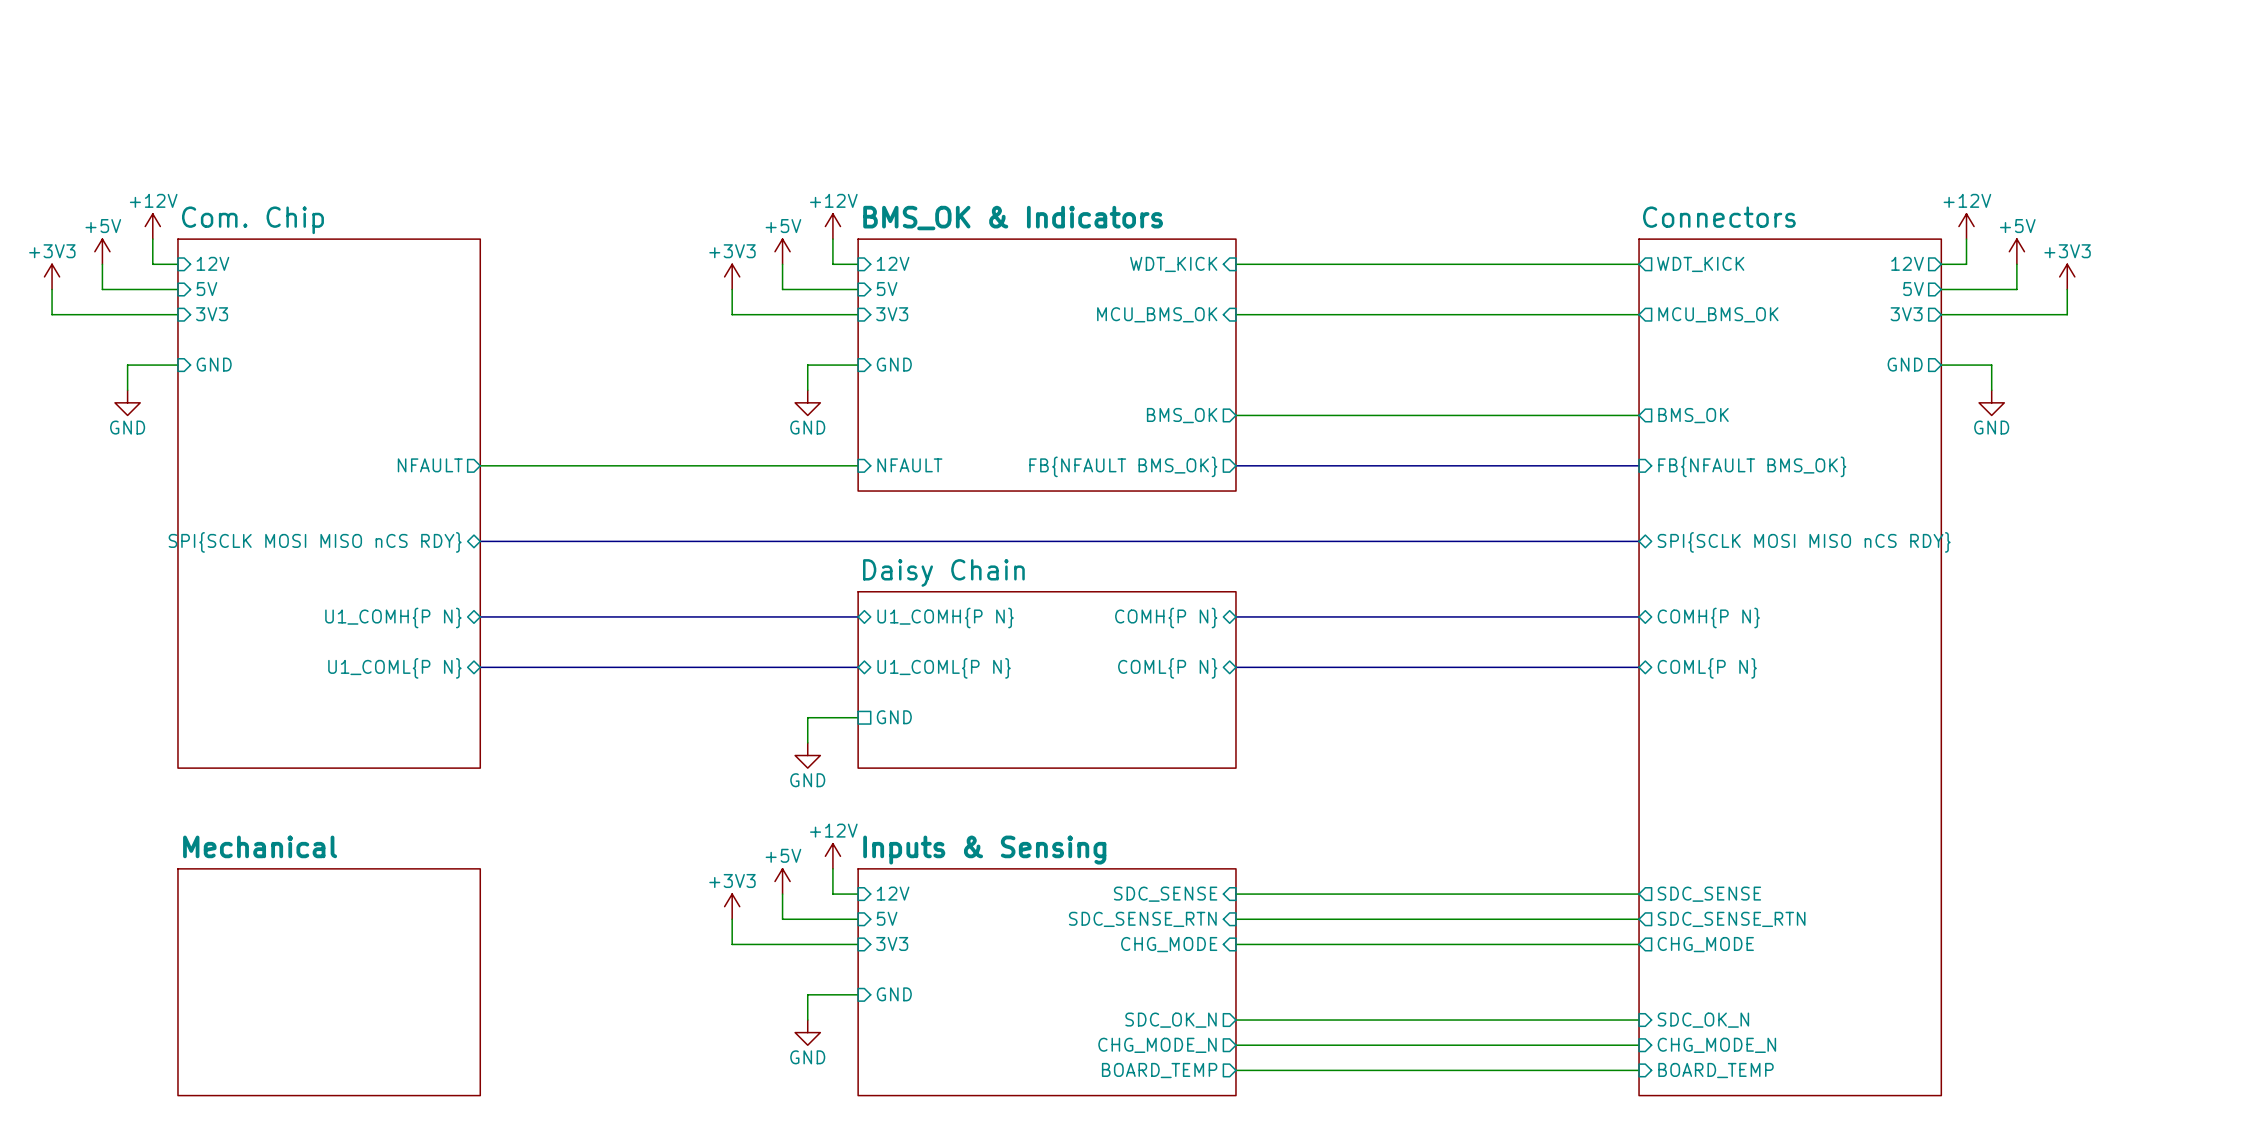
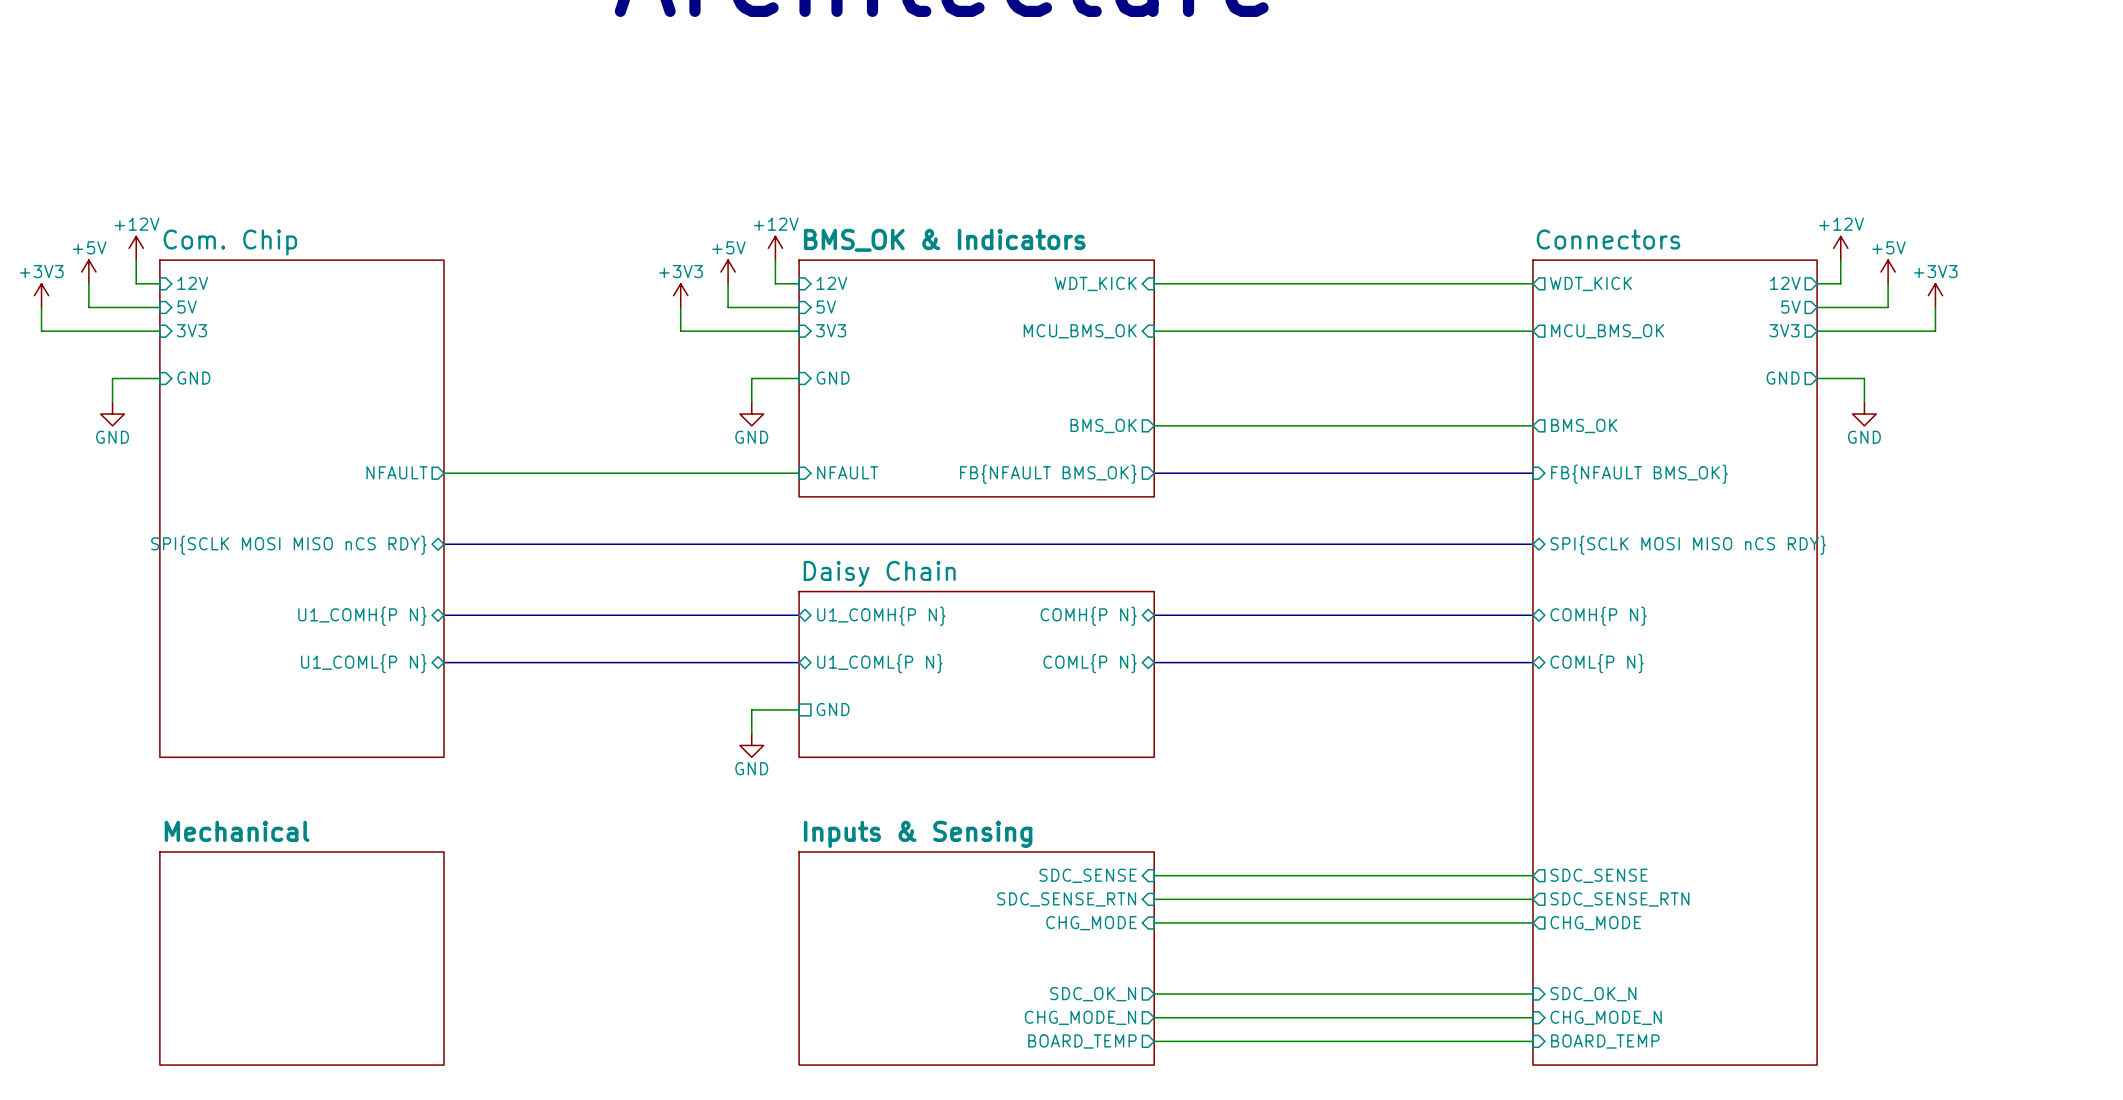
power symbol: +12V (832, 856) -> none
wire: (832, 868) (832, 894) (858, 894) -> none
power symbol: +5V (782, 881) -> none
sheet pin: 12V (893, 893) -> none
wire: (782, 894) (782, 919) (858, 919) -> none
power symbol: +3V3 (732, 906) -> none
sheet pin: 5V (887, 918) -> none
wire: (732, 919) (732, 944) (858, 944) -> none
sheet pin: 3V3 (892, 943) -> none
wire: (858, 994) (807, 994) (807, 1020) -> none
sheet pin: GND (894, 994) -> none
power symbol: GND (807, 1032) -> none

